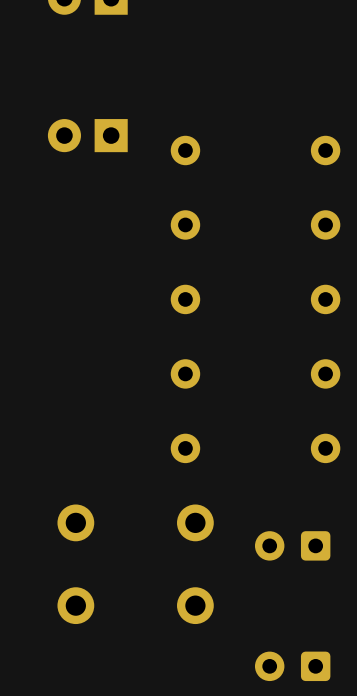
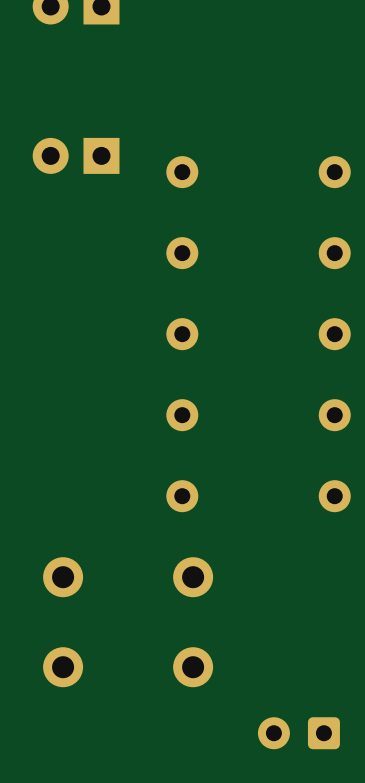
part: (292, 545) -> none

